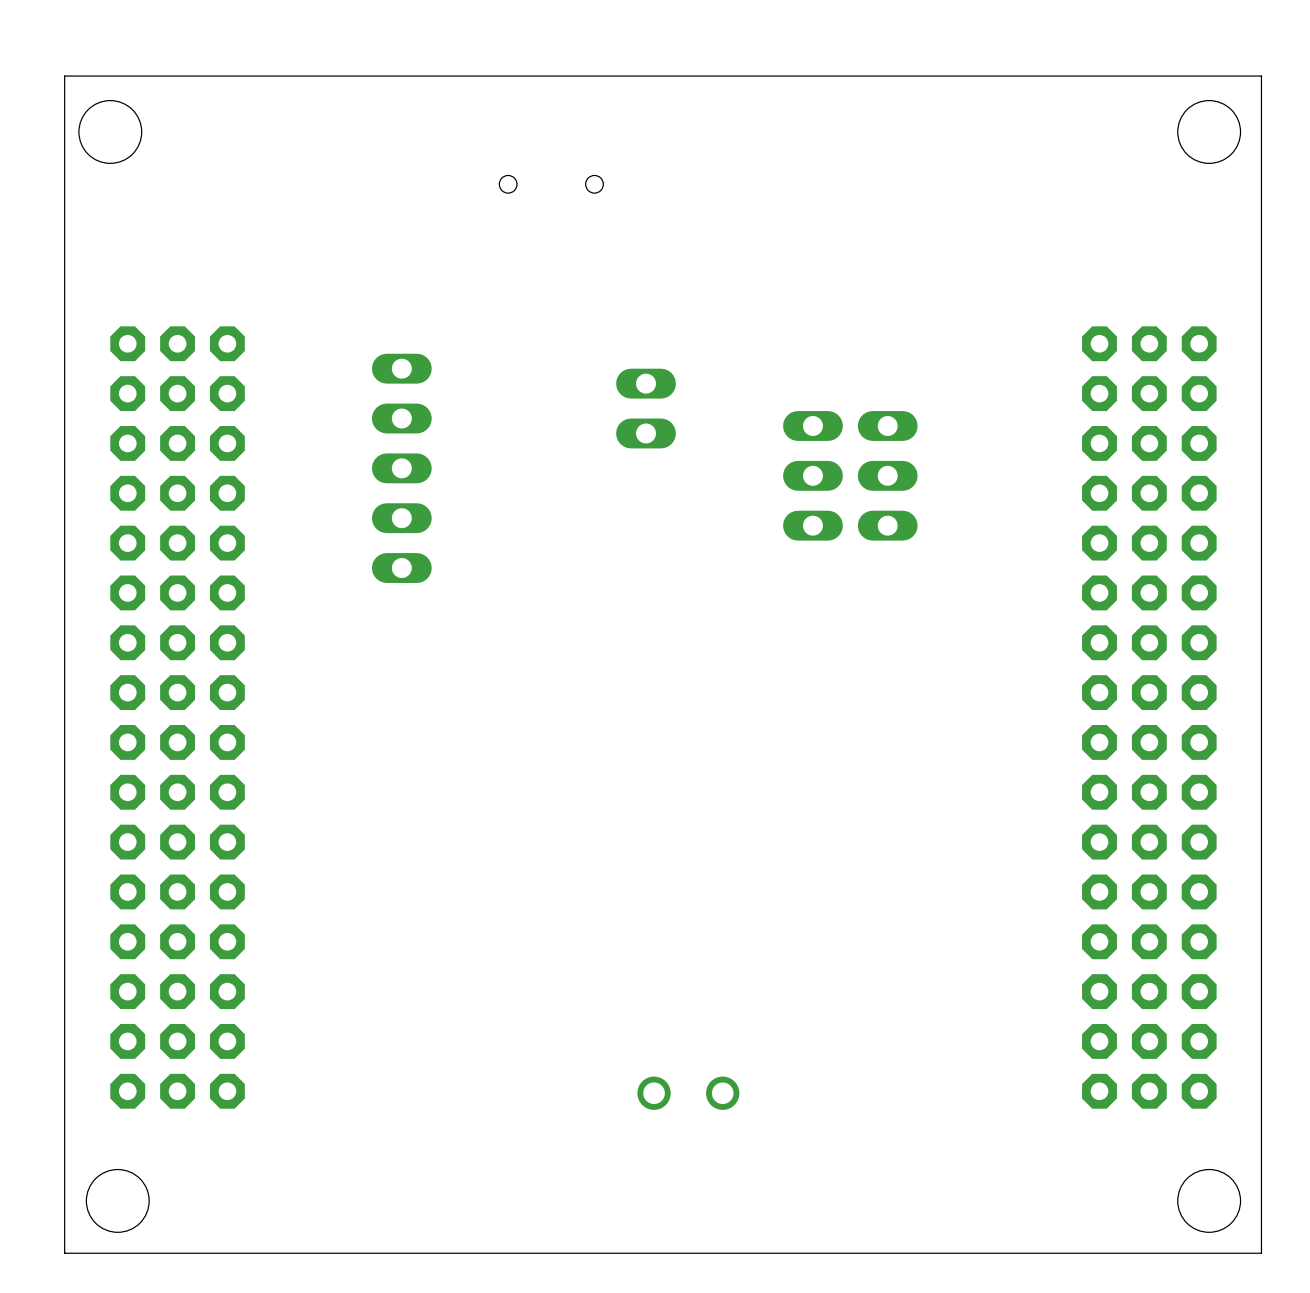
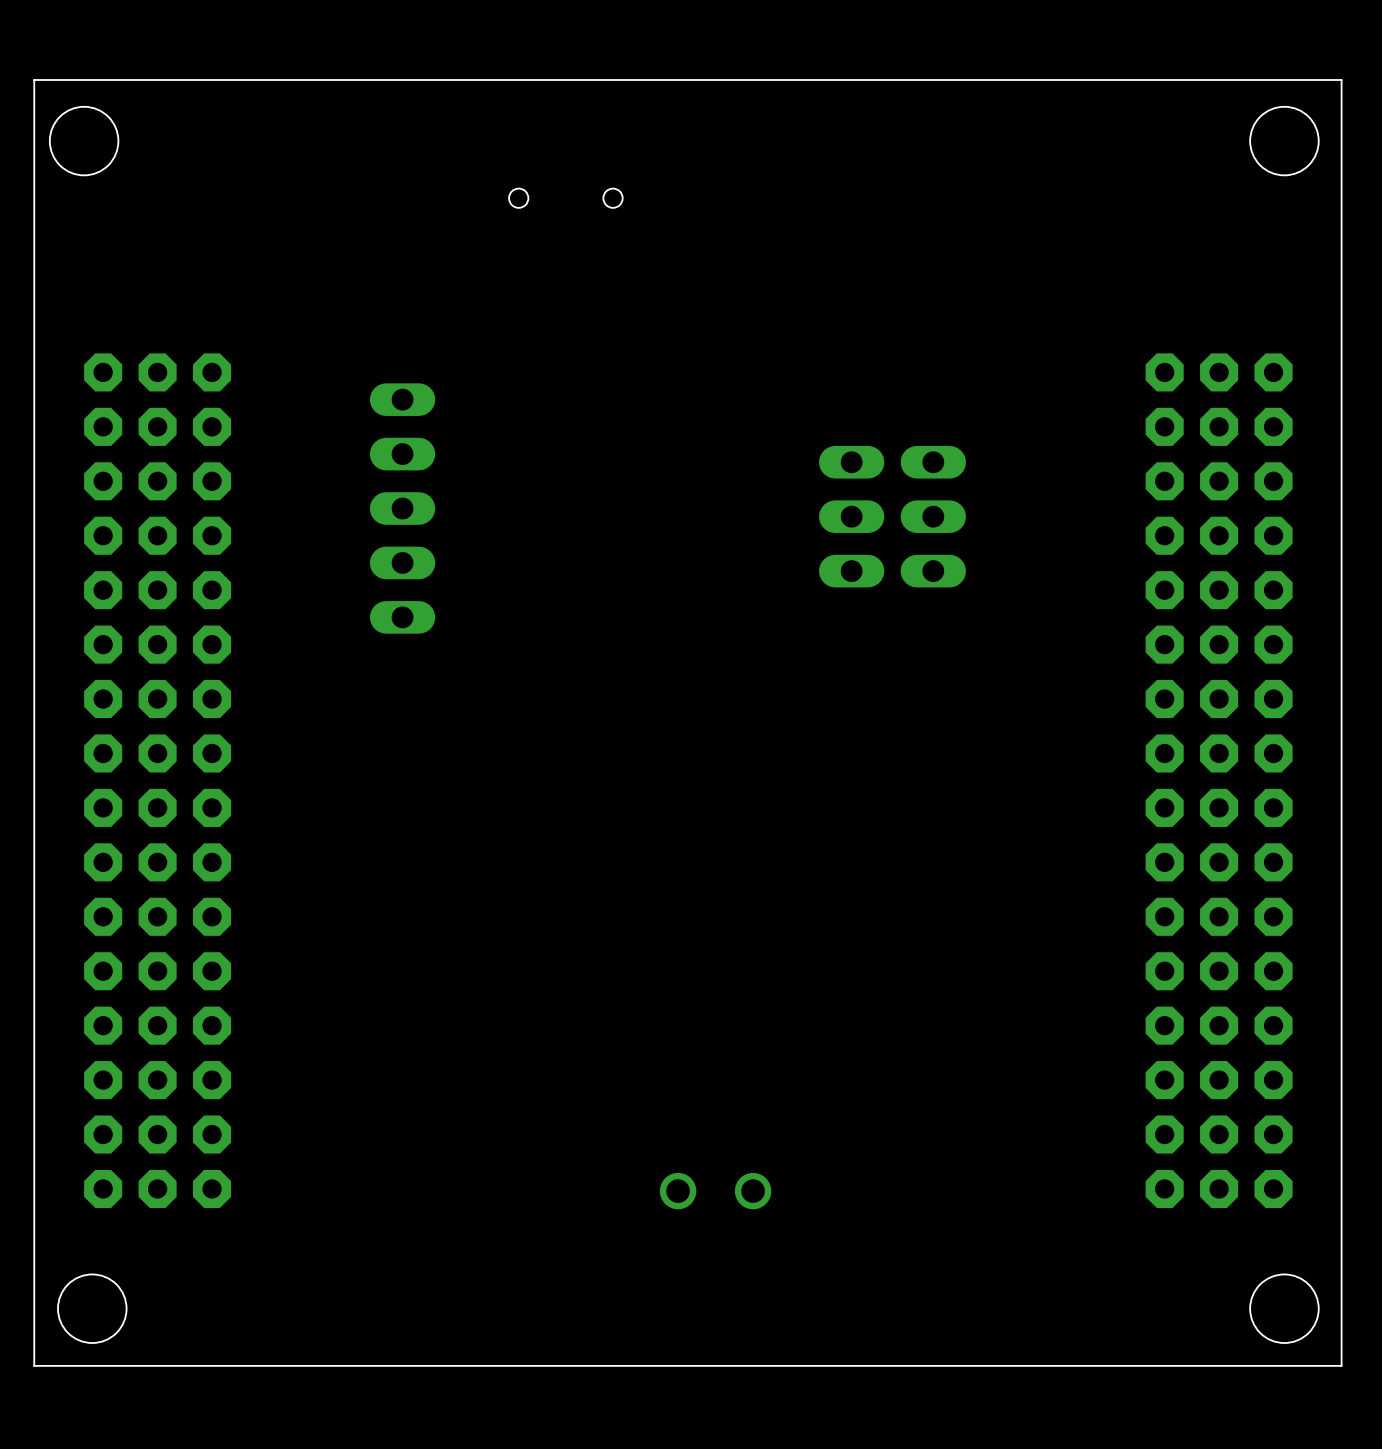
part: (646, 408) -> none

